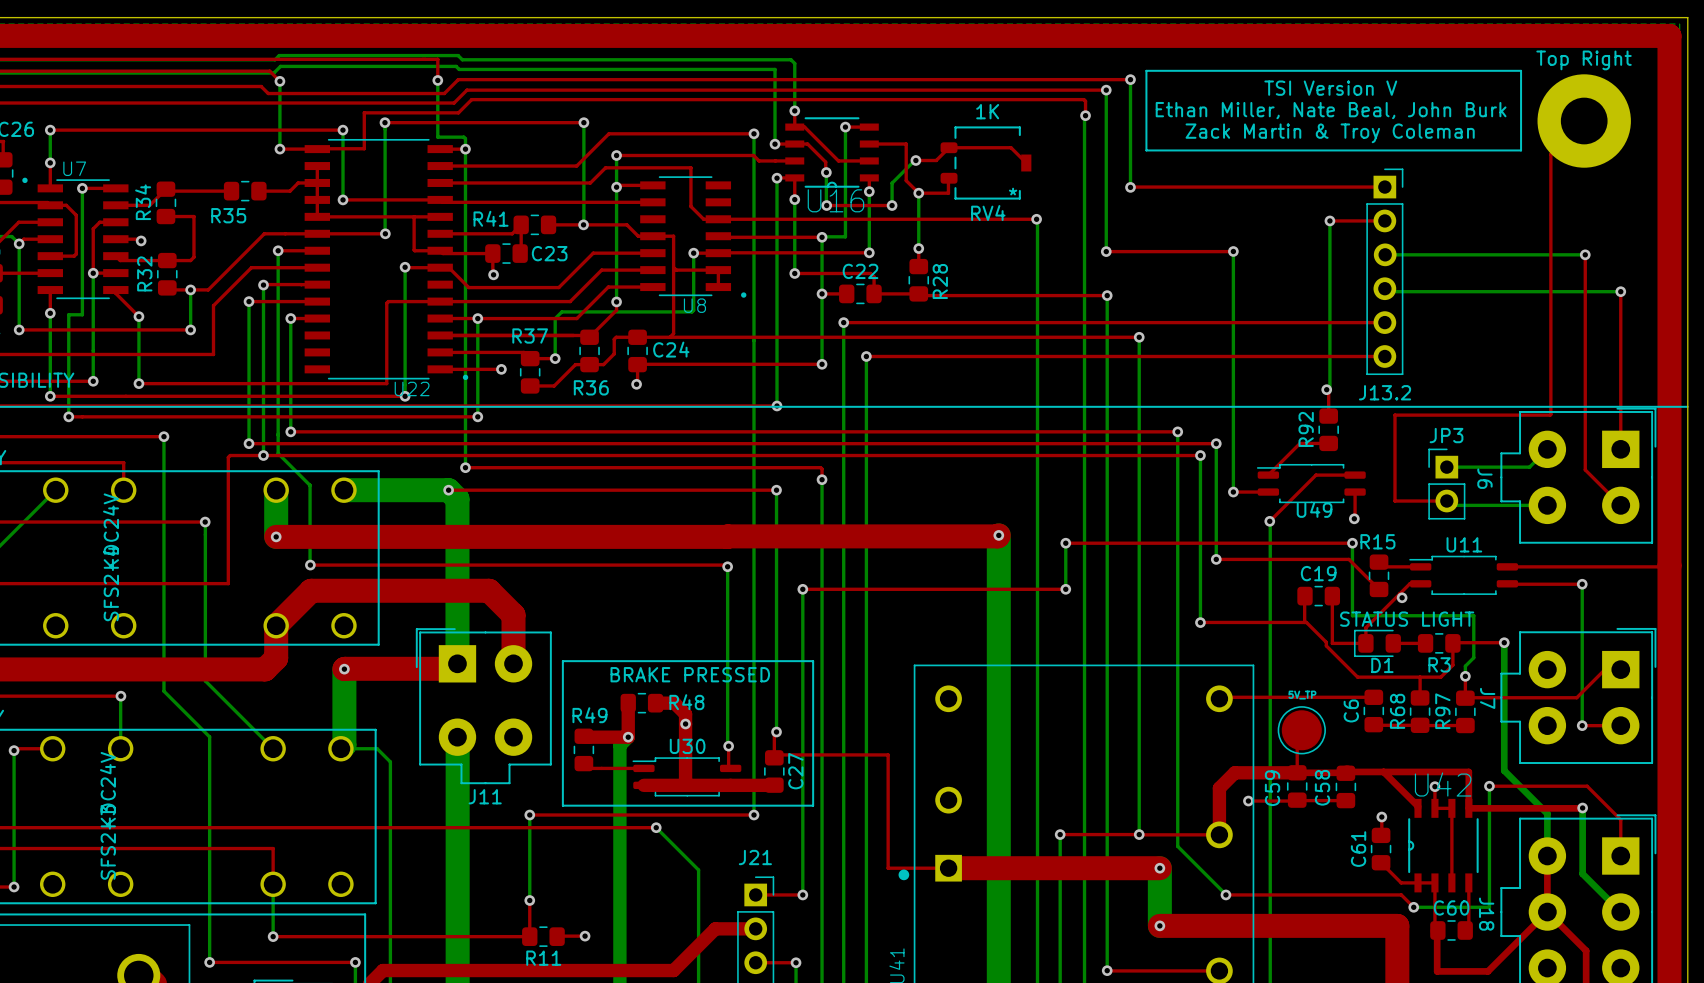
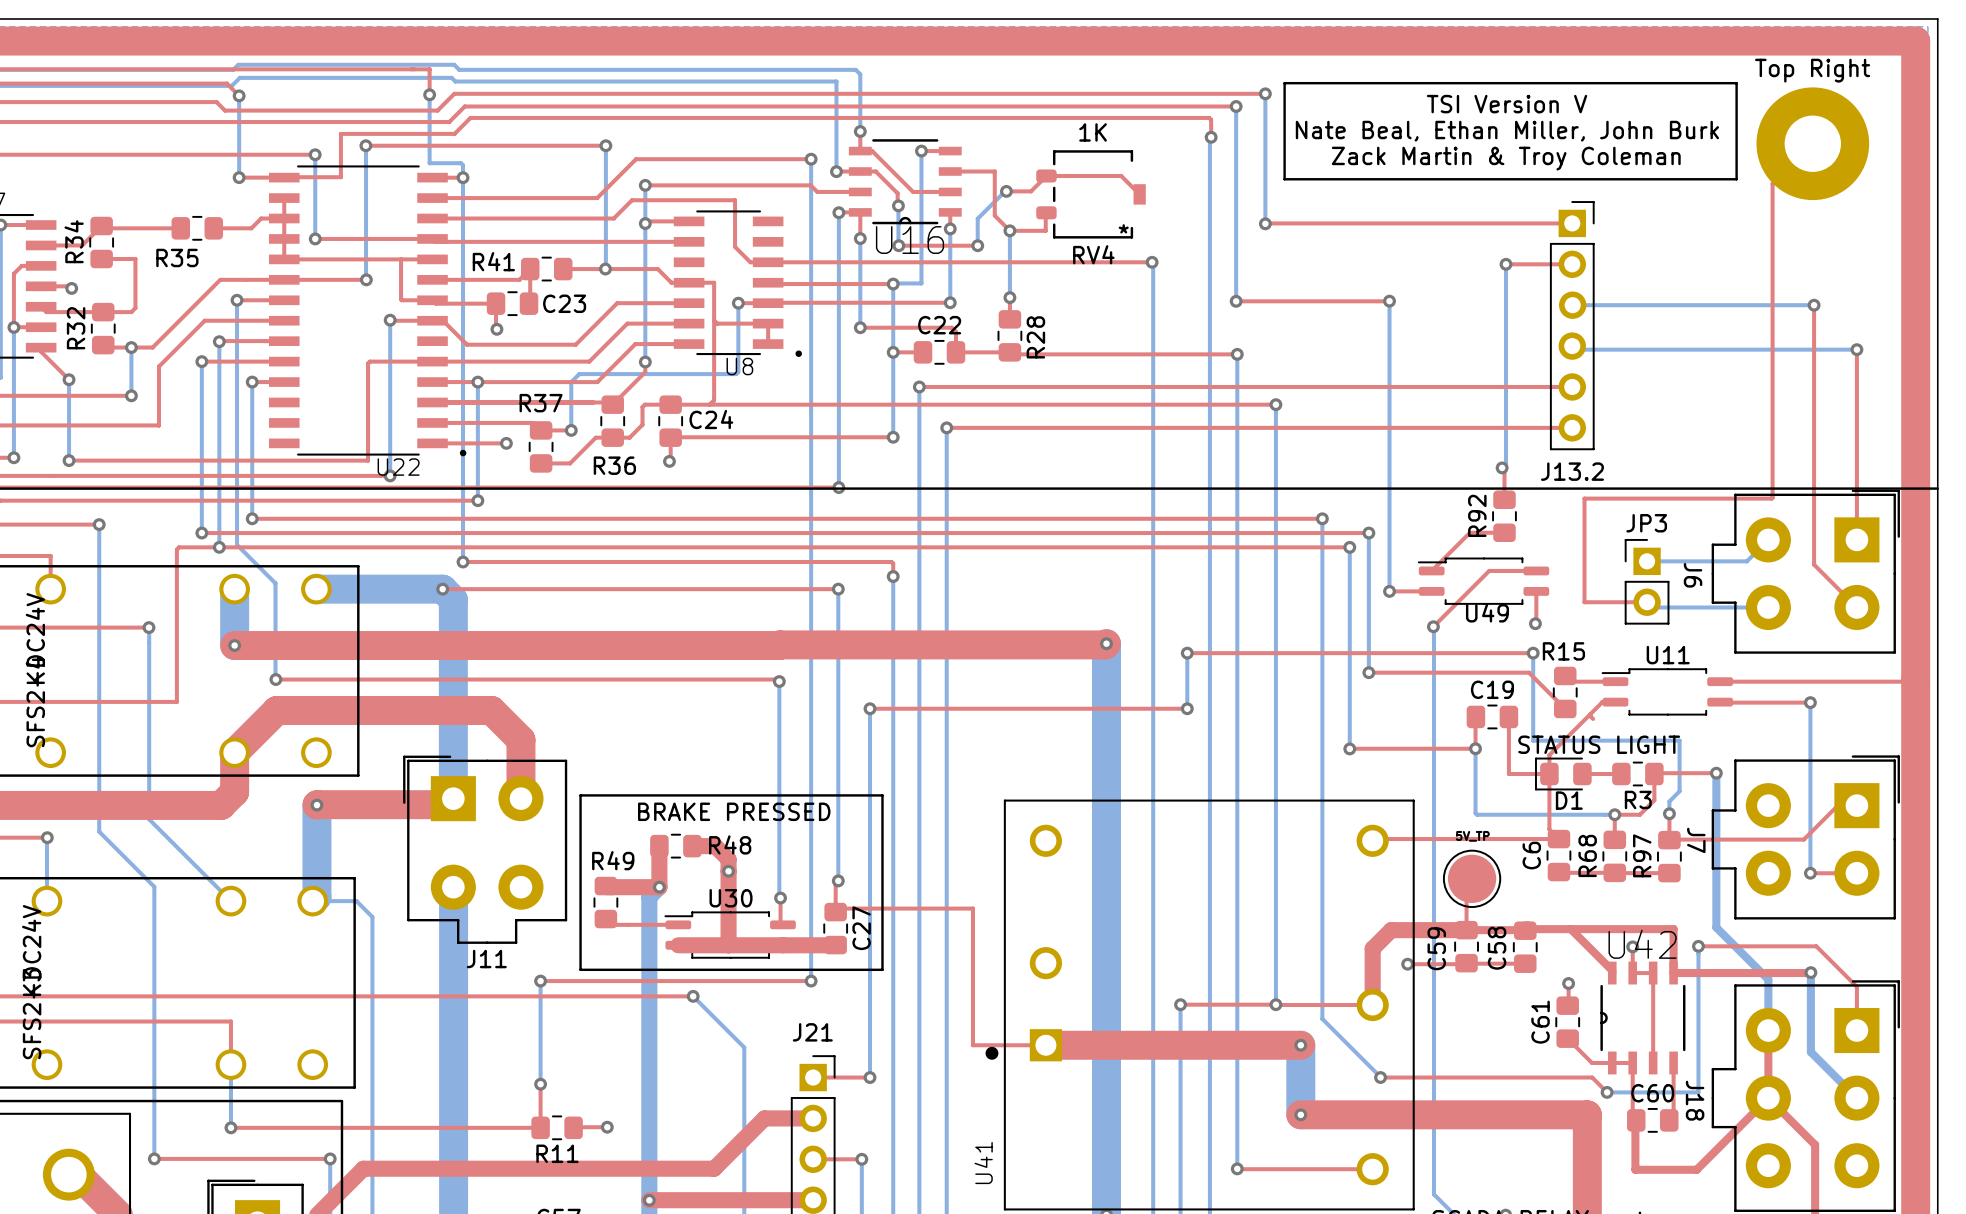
text: Ethan Miller, Nate Beal, John Burk (1331, 110) -> Nate Beal, Ethan Miller, John Burk (1507, 131)
via: (1402, 597) -> none
top track: (1304, 622) (1326, 642) (1326, 645) (1357, 677) (1420, 677) -> none
bottom track: none -> (1475, 748) (1475, 813) (1477, 814) (1614, 814)
via: none -> (1475, 748)
top track: none -> (1549, 774) (1549, 829) (1558, 839)
via: none -> (1614, 814)

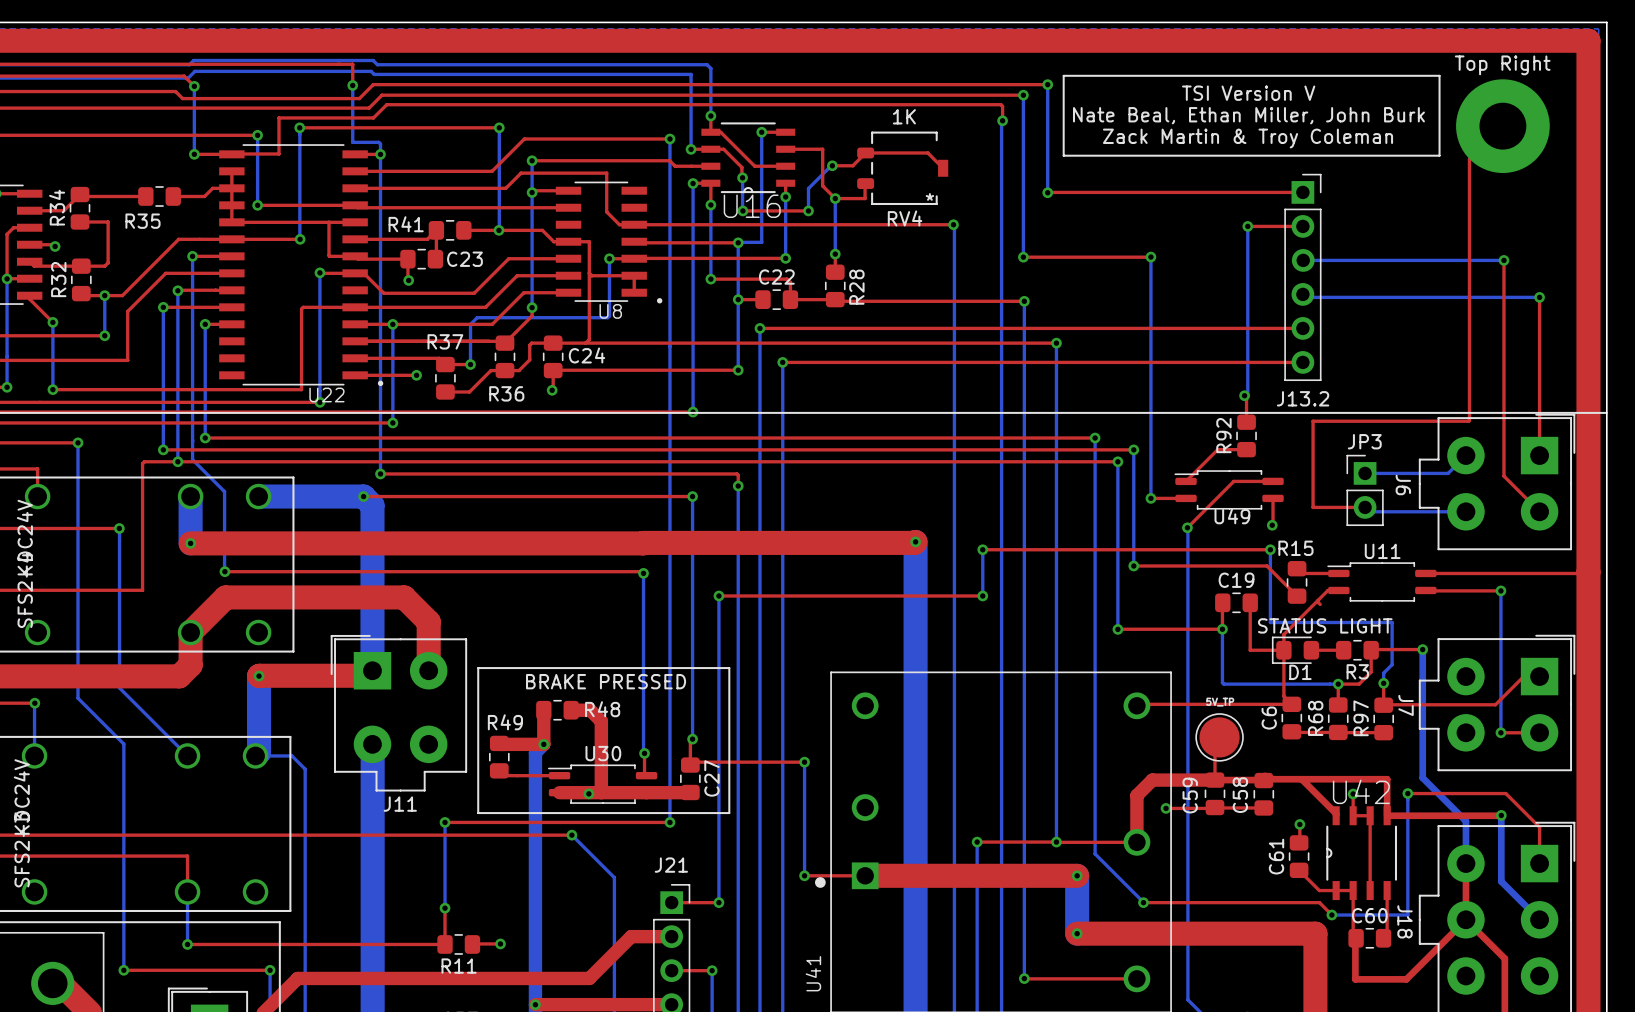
via position: (728, 871) -> (588, 793)
top track: (972, 908) (972, 1045) -> none
bottom track: none -> (804, 762) (804, 875)
via: none -> (804, 762)
via: none -> (804, 875)

